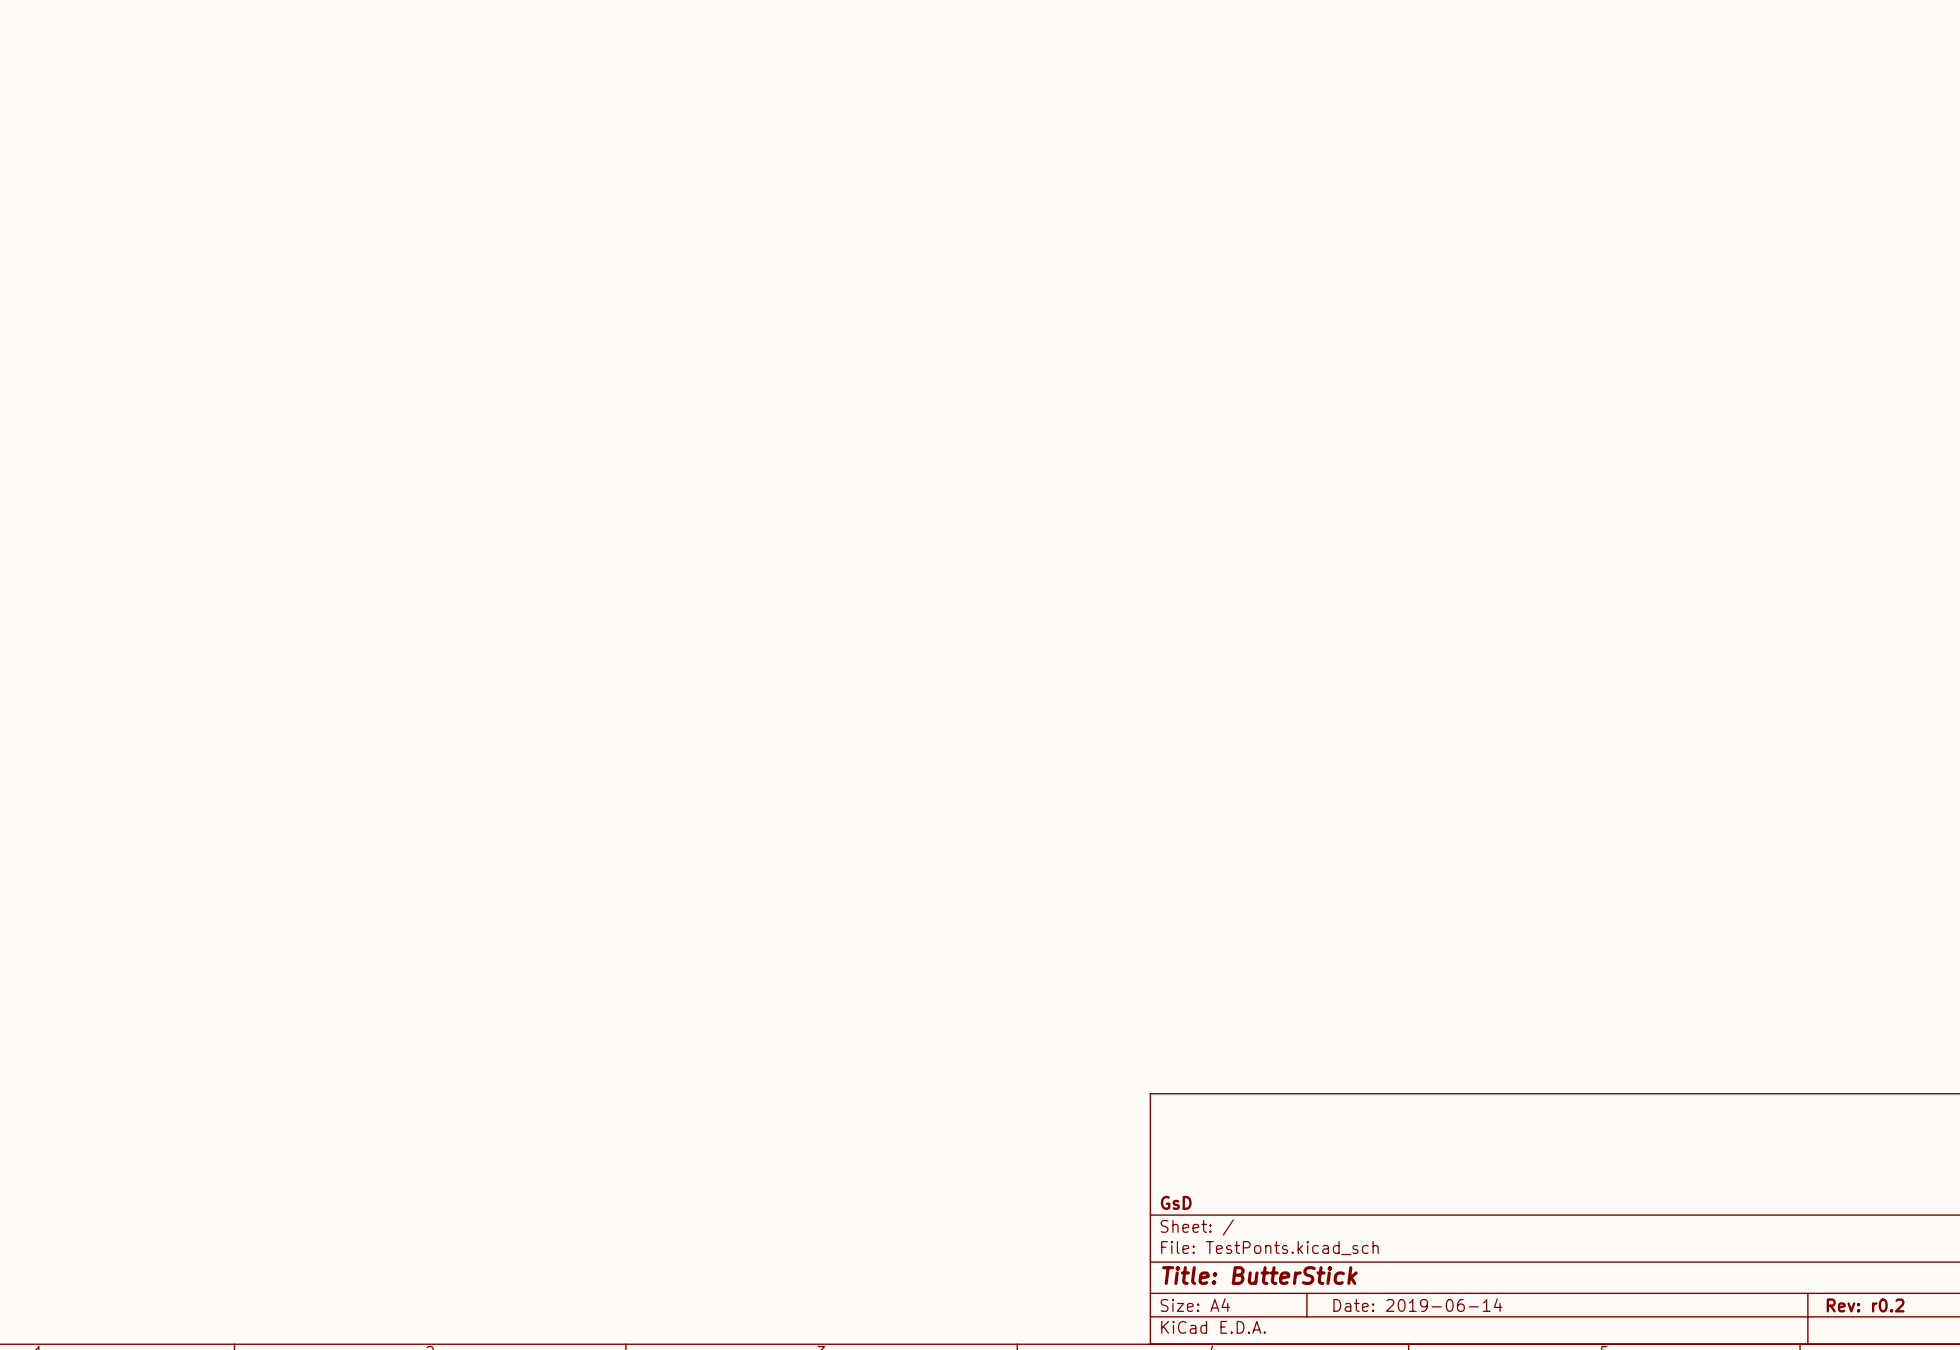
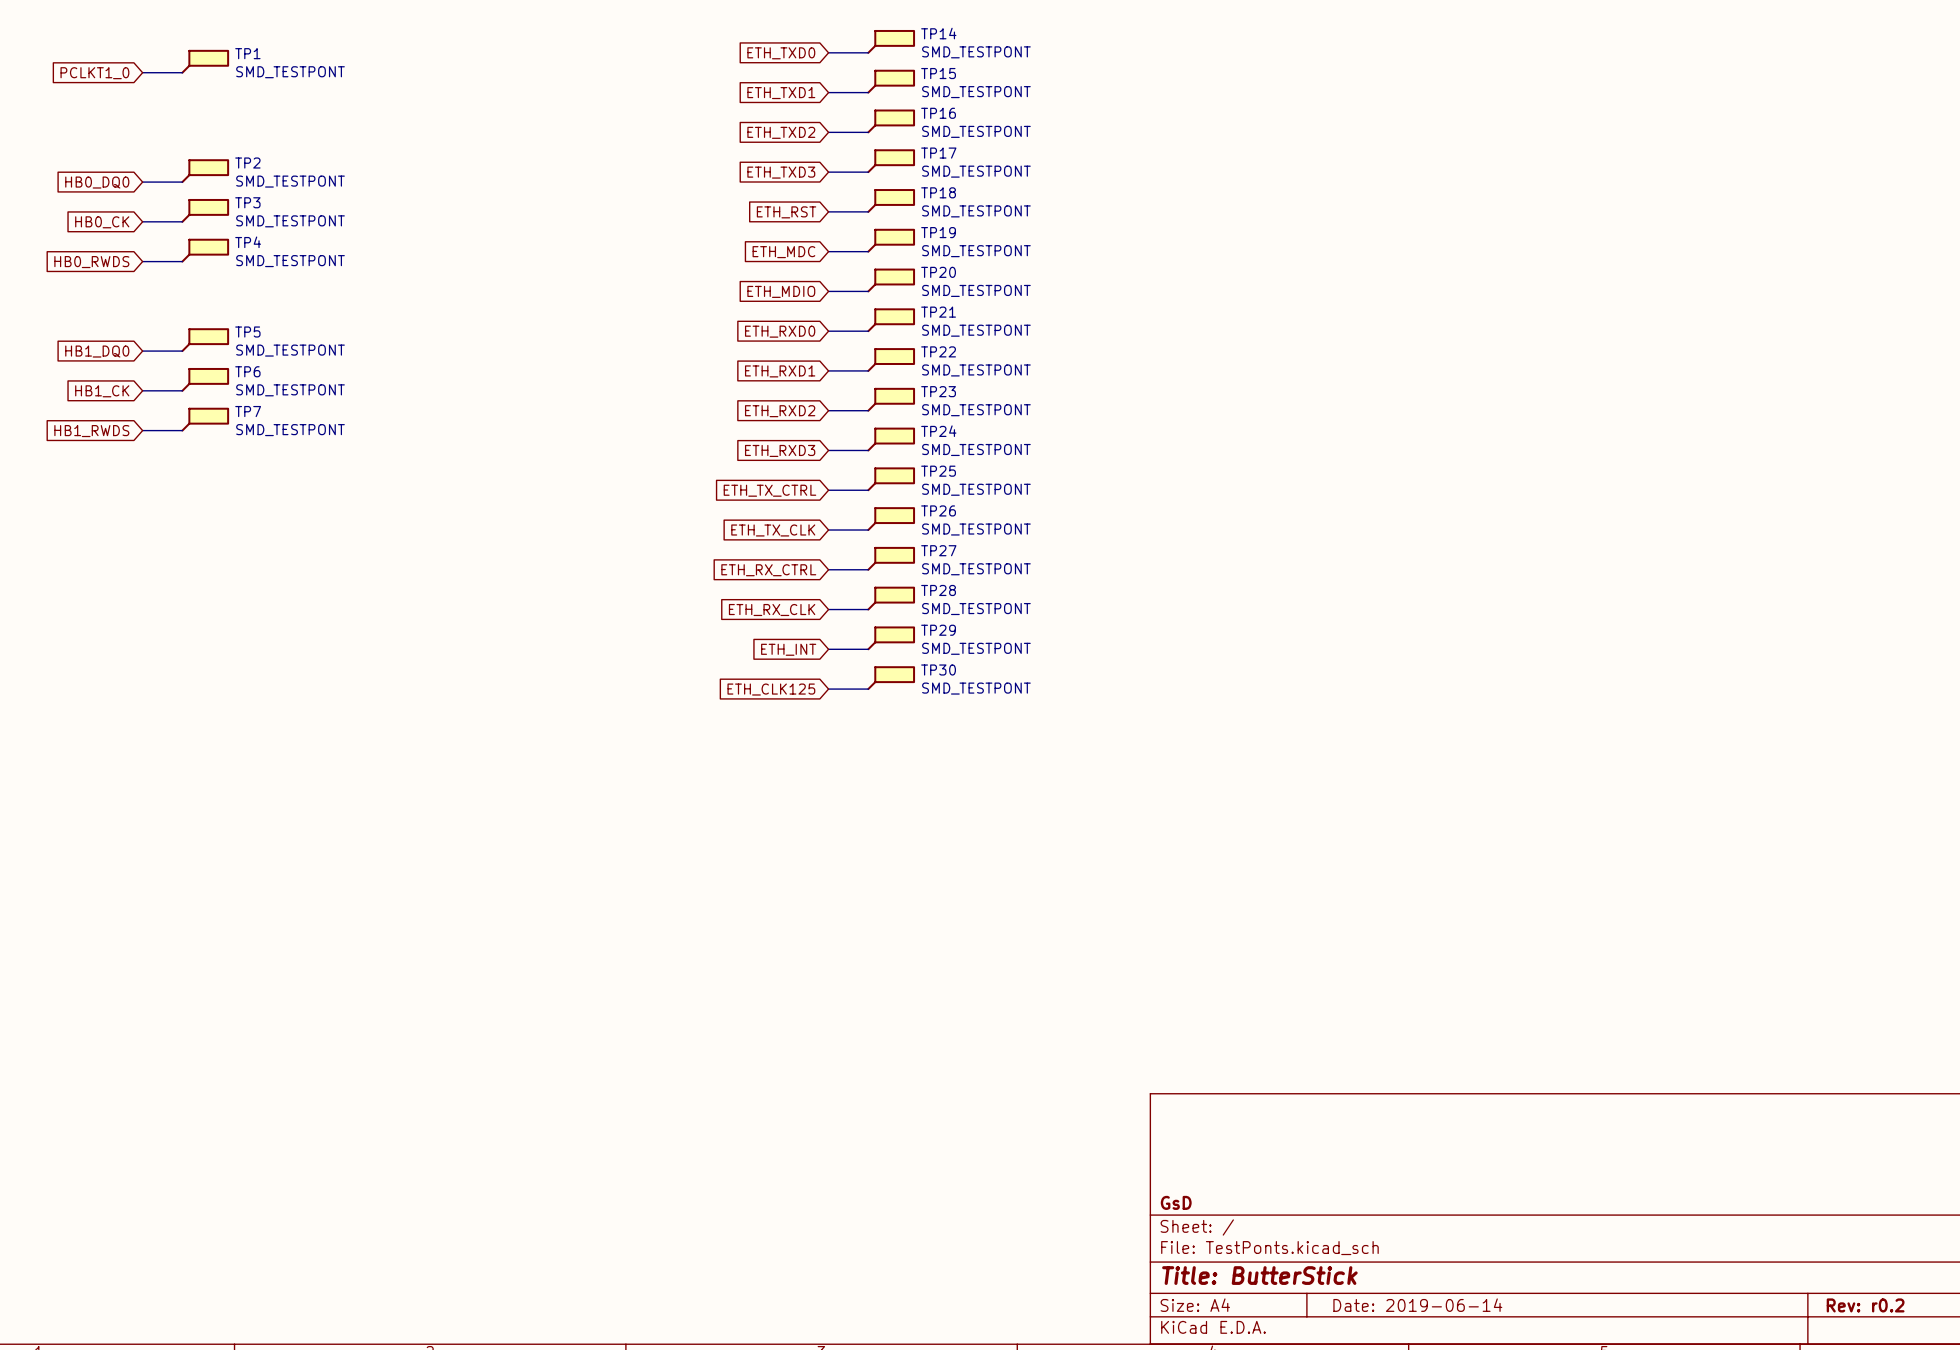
TP14: none -> SMD_TESTPONT (891, 41)
wire: none -> (828, 52) (868, 52)
global label: none -> ETH_TXD0 (781, 53)
TP1: none -> SMD_TESTPONT (205, 61)
wire: none -> (142, 72) (182, 72)
global label: none -> PCLKT1_0 (94, 73)
TP15: none -> SMD_TESTPONT (891, 81)
wire: none -> (828, 92) (868, 92)
global label: none -> ETH_TXD1 (781, 93)
TP16: none -> SMD_TESTPONT (891, 121)
global label: none -> ETH_TXD2 (781, 132)
wire: none -> (828, 132) (868, 132)
TP17: none -> SMD_TESTPONT (891, 161)
TP2: none -> SMD_TESTPONT (205, 171)
global label: none -> ETH_TXD3 (781, 172)
wire: none -> (828, 172) (868, 172)
global label: none -> HB0_DQ0 (97, 182)
wire: none -> (142, 182) (182, 182)
TP18: none -> SMD_TESTPONT (891, 200)
TP3: none -> SMD_TESTPONT (205, 210)
wire: none -> (828, 211) (868, 211)
global label: none -> ETH_RST (786, 212)
wire: none -> (142, 221) (182, 221)
global label: none -> HB0_CK (102, 222)
TP19: none -> SMD_TESTPONT (891, 240)
TP4: none -> SMD_TESTPONT (205, 250)
wire: none -> (828, 251) (868, 251)
global label: none -> ETH_MDC (783, 252)
wire: none -> (142, 261) (182, 261)
global label: none -> HB0_RWDS (91, 262)
TP20: none -> SMD_TESTPONT (891, 280)
global label: none -> ETH_MDIO (781, 291)
wire: none -> (828, 291) (868, 291)
TP21: none -> SMD_TESTPONT (891, 320)
global label: none -> ETH_RXD0 (780, 331)
wire: none -> (828, 331) (868, 331)
TP5: none -> SMD_TESTPONT (205, 340)
global label: none -> HB1_DQ0 (97, 351)
wire: none -> (142, 351) (182, 351)
TP22: none -> SMD_TESTPONT (891, 360)
wire: none -> (828, 370) (868, 370)
global label: none -> ETH_RXD1 (780, 371)
TP6: none -> SMD_TESTPONT (205, 379)
wire: none -> (142, 390) (182, 390)
global label: none -> HB1_CK (102, 391)
TP23: none -> SMD_TESTPONT (891, 399)
wire: none -> (828, 410) (868, 410)
global label: none -> ETH_RXD2 (780, 411)
TP7: none -> SMD_TESTPONT (205, 419)
wire: none -> (142, 430) (182, 430)
global label: none -> HB1_RWDS (91, 431)
TP24: none -> SMD_TESTPONT (891, 439)
global label: none -> ETH_RXD3 (780, 450)
wire: none -> (828, 450) (868, 450)
TP25: none -> SMD_TESTPONT (891, 479)
global label: none -> ETH_TX_CTRL (769, 490)
wire: none -> (828, 490) (868, 490)
TP26: none -> SMD_TESTPONT (891, 519)
global label: none -> ETH_TX_CLK (773, 530)
wire: none -> (828, 530) (868, 530)
TP27: none -> SMD_TESTPONT (891, 558)
wire: none -> (828, 569) (868, 569)
global label: none -> ETH_RX_CTRL (768, 570)
TP28: none -> SMD_TESTPONT (891, 598)
wire: none -> (828, 609) (868, 609)
global label: none -> ETH_RX_CLK (772, 610)
TP29: none -> SMD_TESTPONT (891, 638)
global label: none -> ETH_INT (788, 649)
wire: none -> (828, 649) (868, 649)
TP30: none -> SMD_TESTPONT (891, 678)
global label: none -> ETH_CLK125 (771, 689)
wire: none -> (828, 689) (868, 689)

